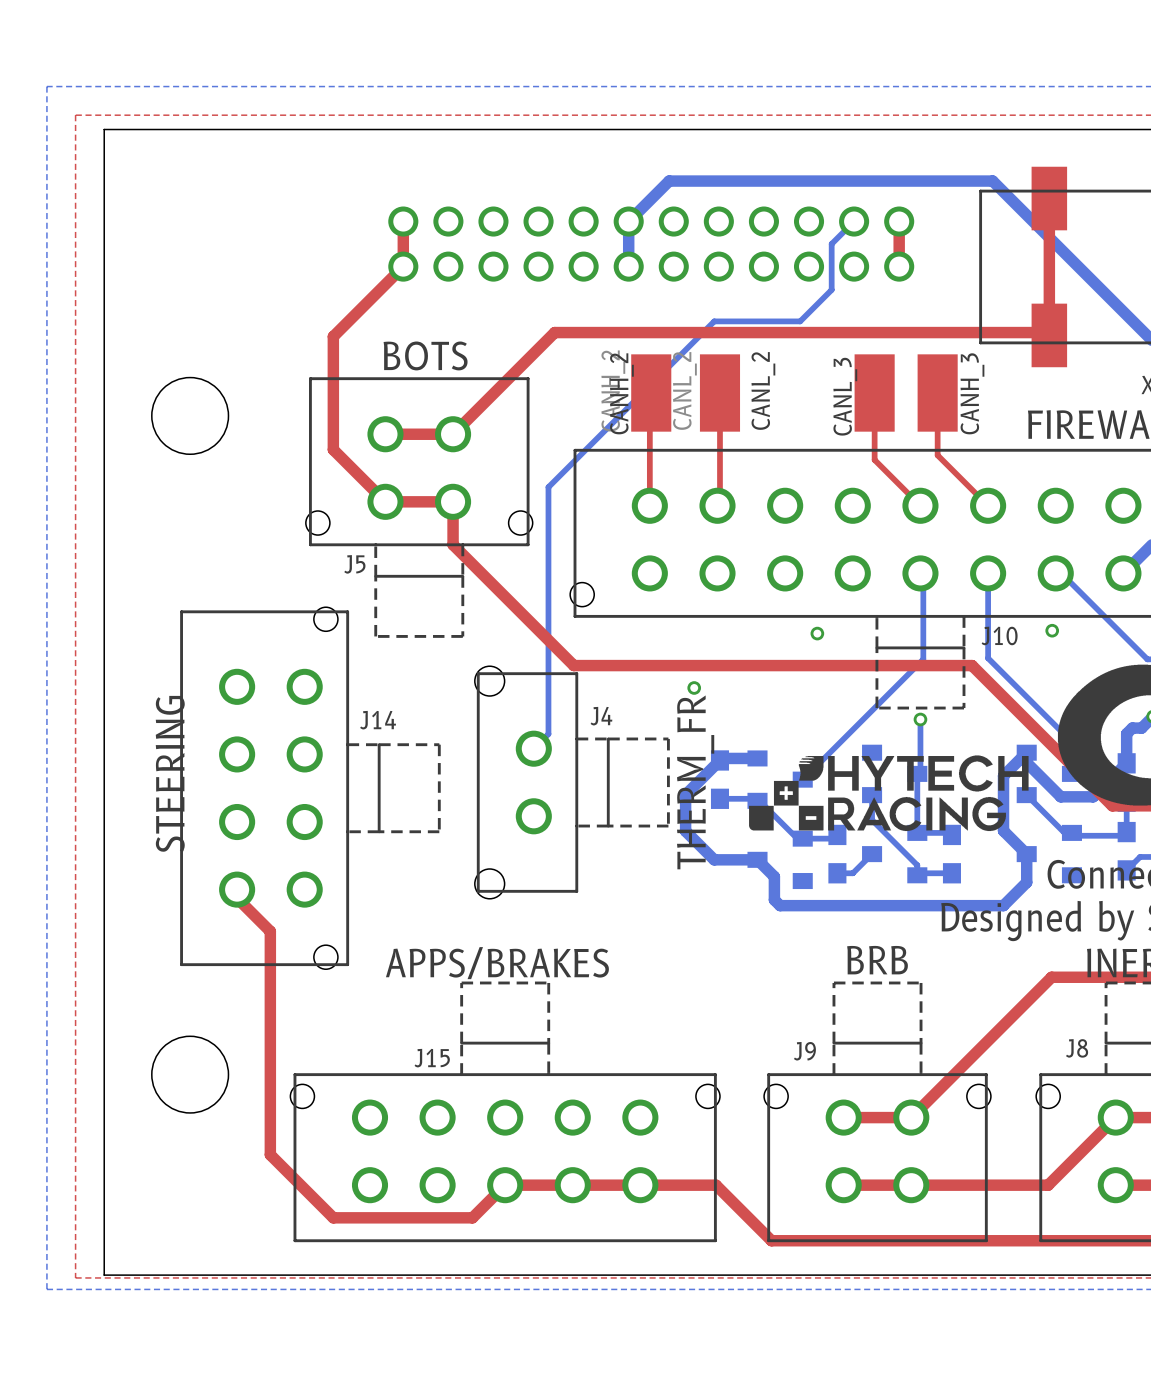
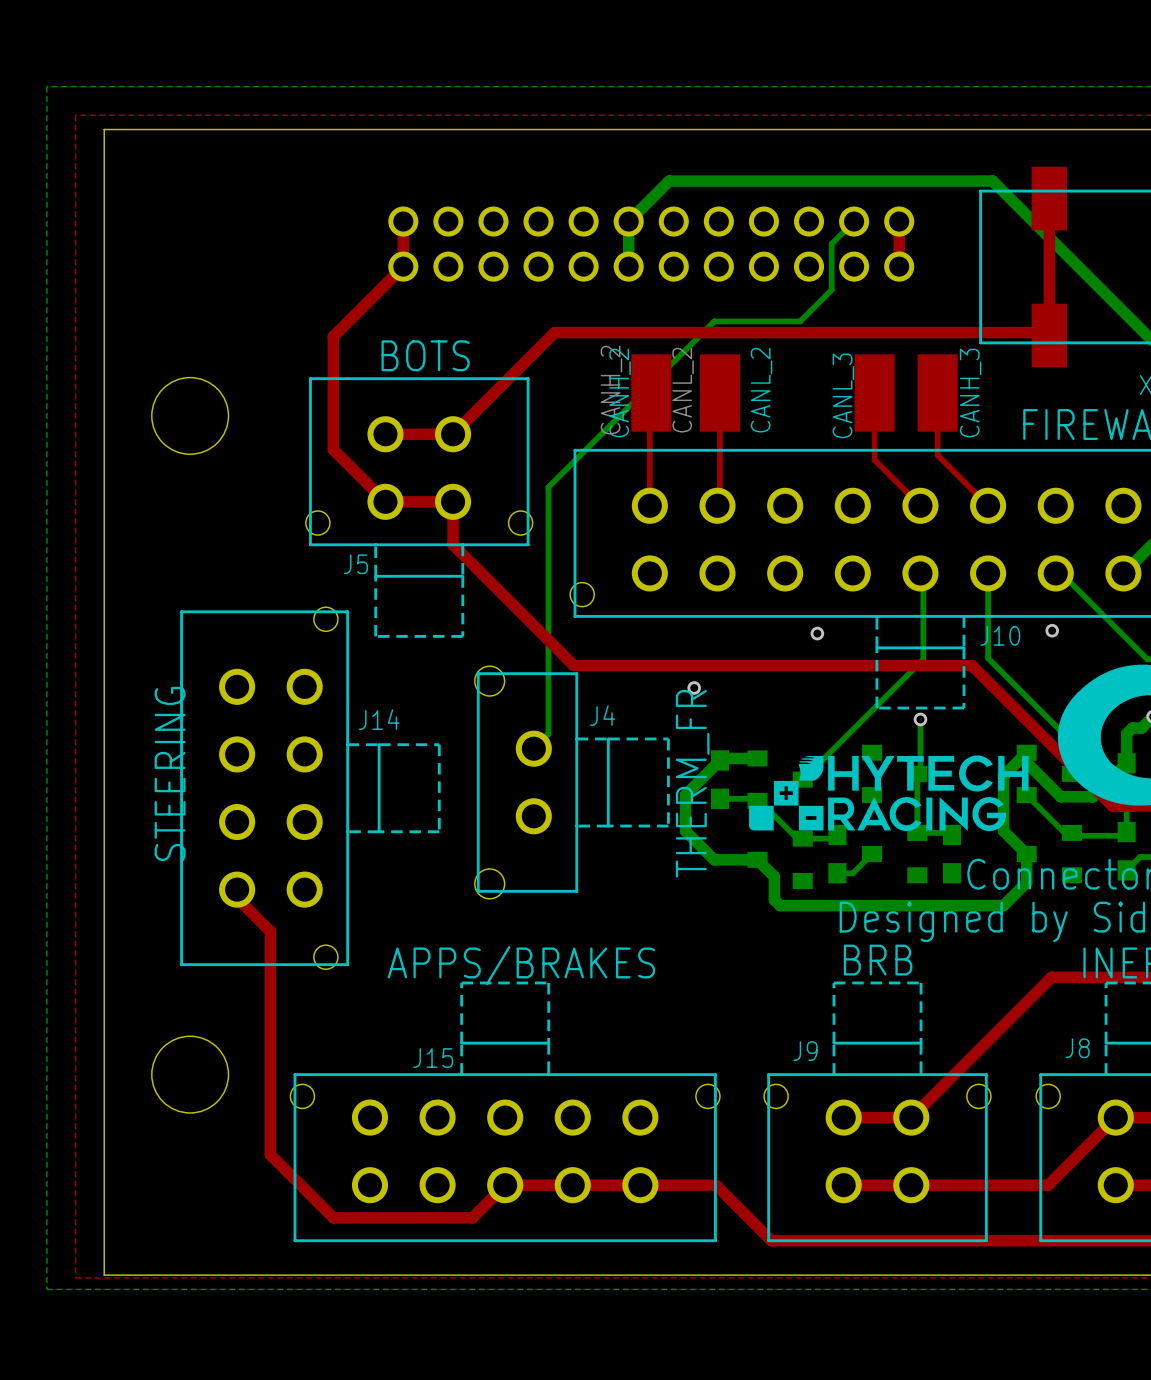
bottom track: (872, 795) (872, 820) (917, 865) (917, 875) (919, 873) (951, 873) -> none

